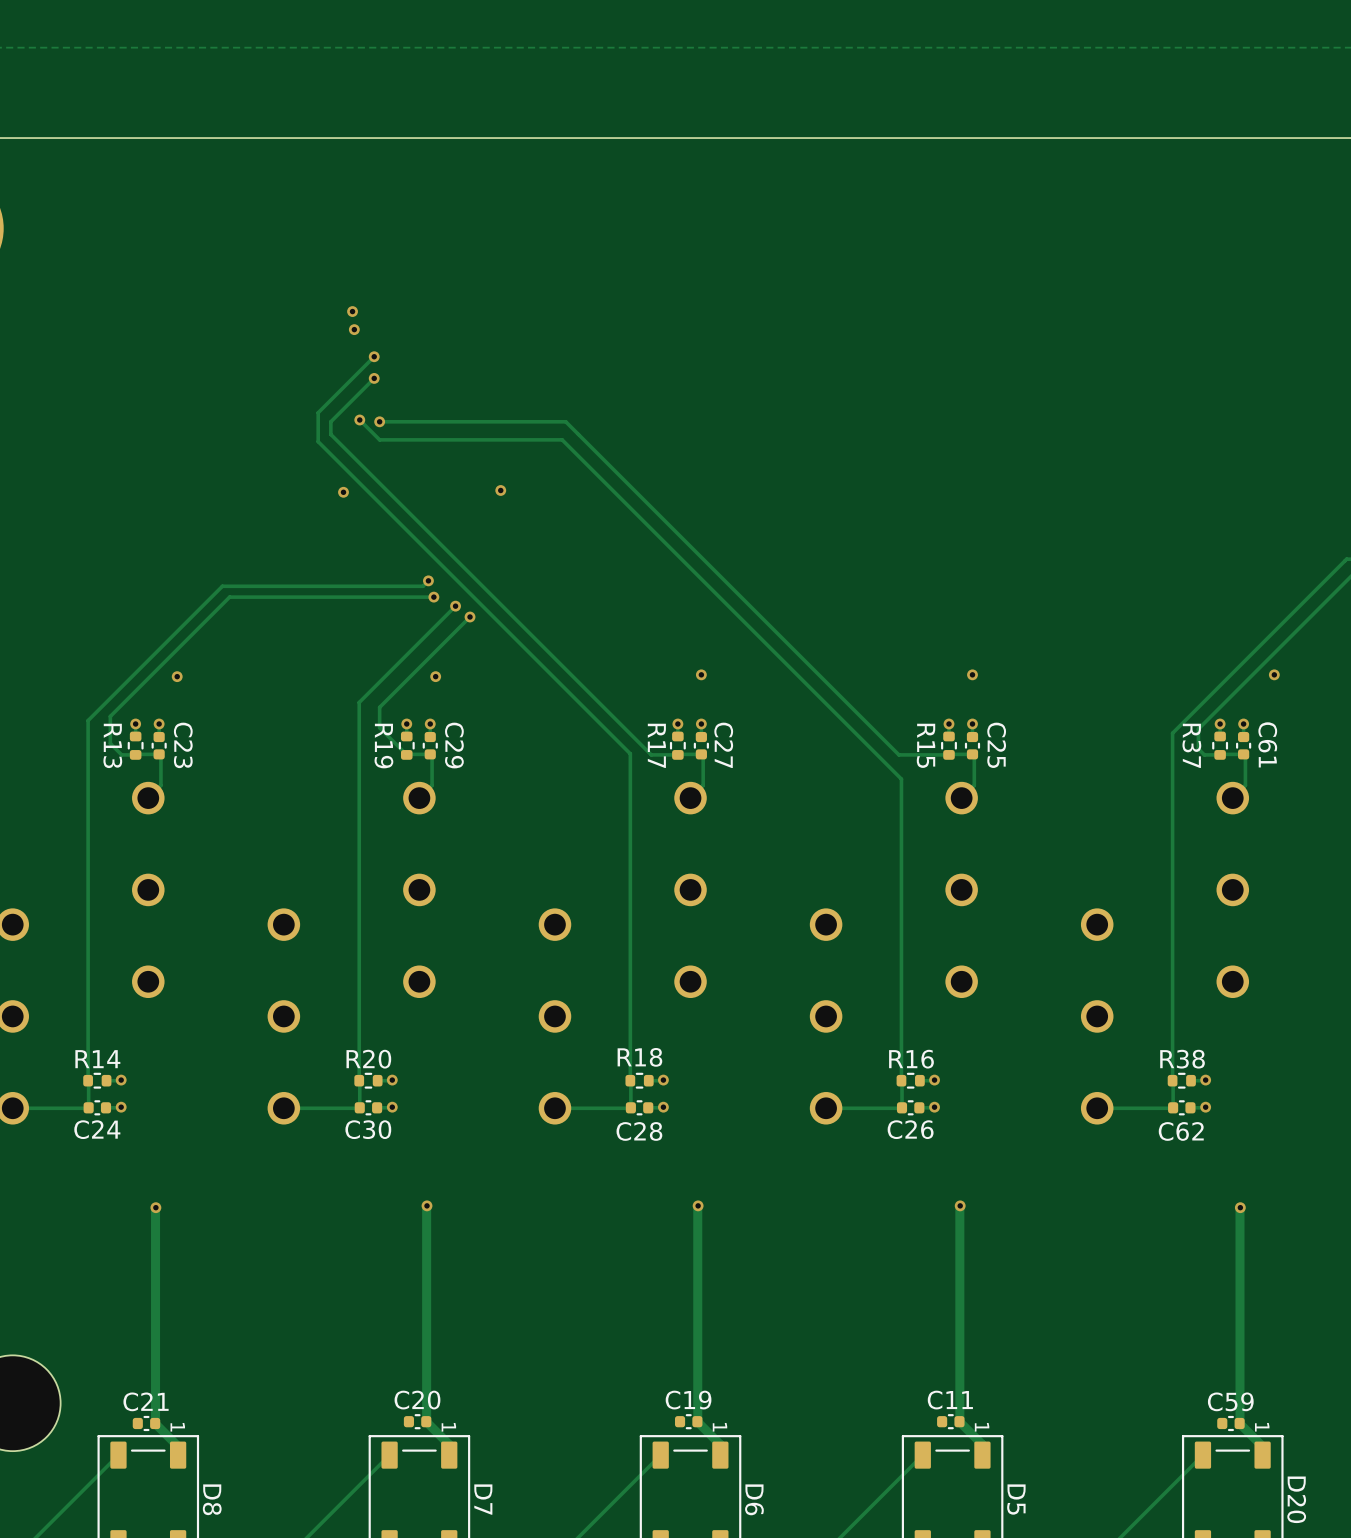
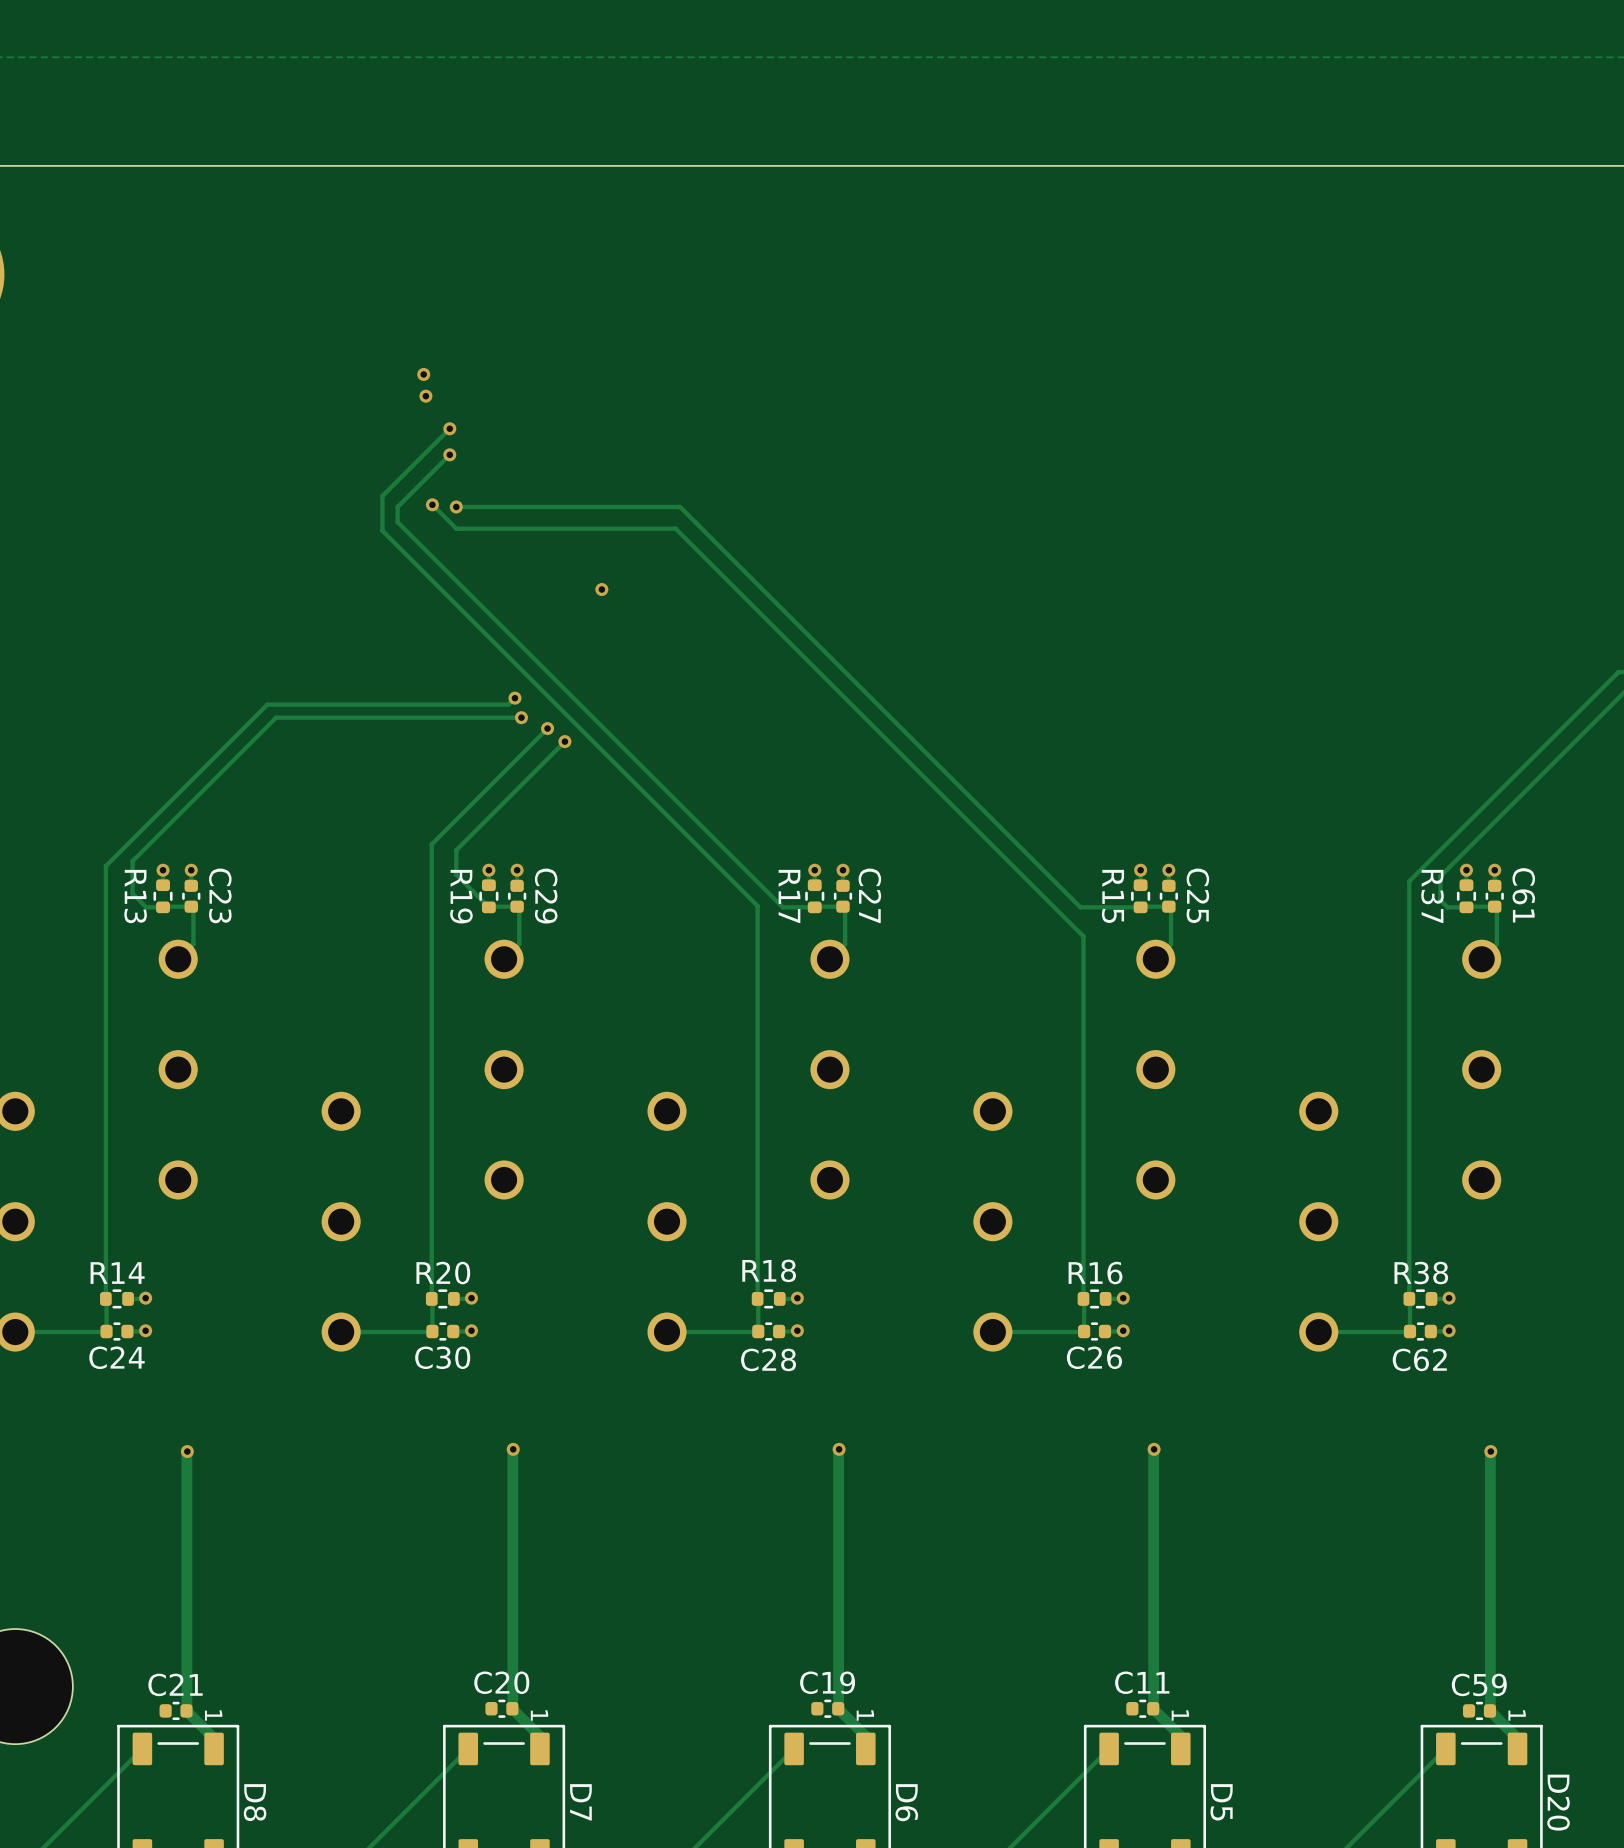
via: (343, 492) -> none
via: (701, 674) -> none
via: (972, 674) -> none
via: (1274, 674) -> none
via: (177, 676) -> none
via: (435, 676) -> none

